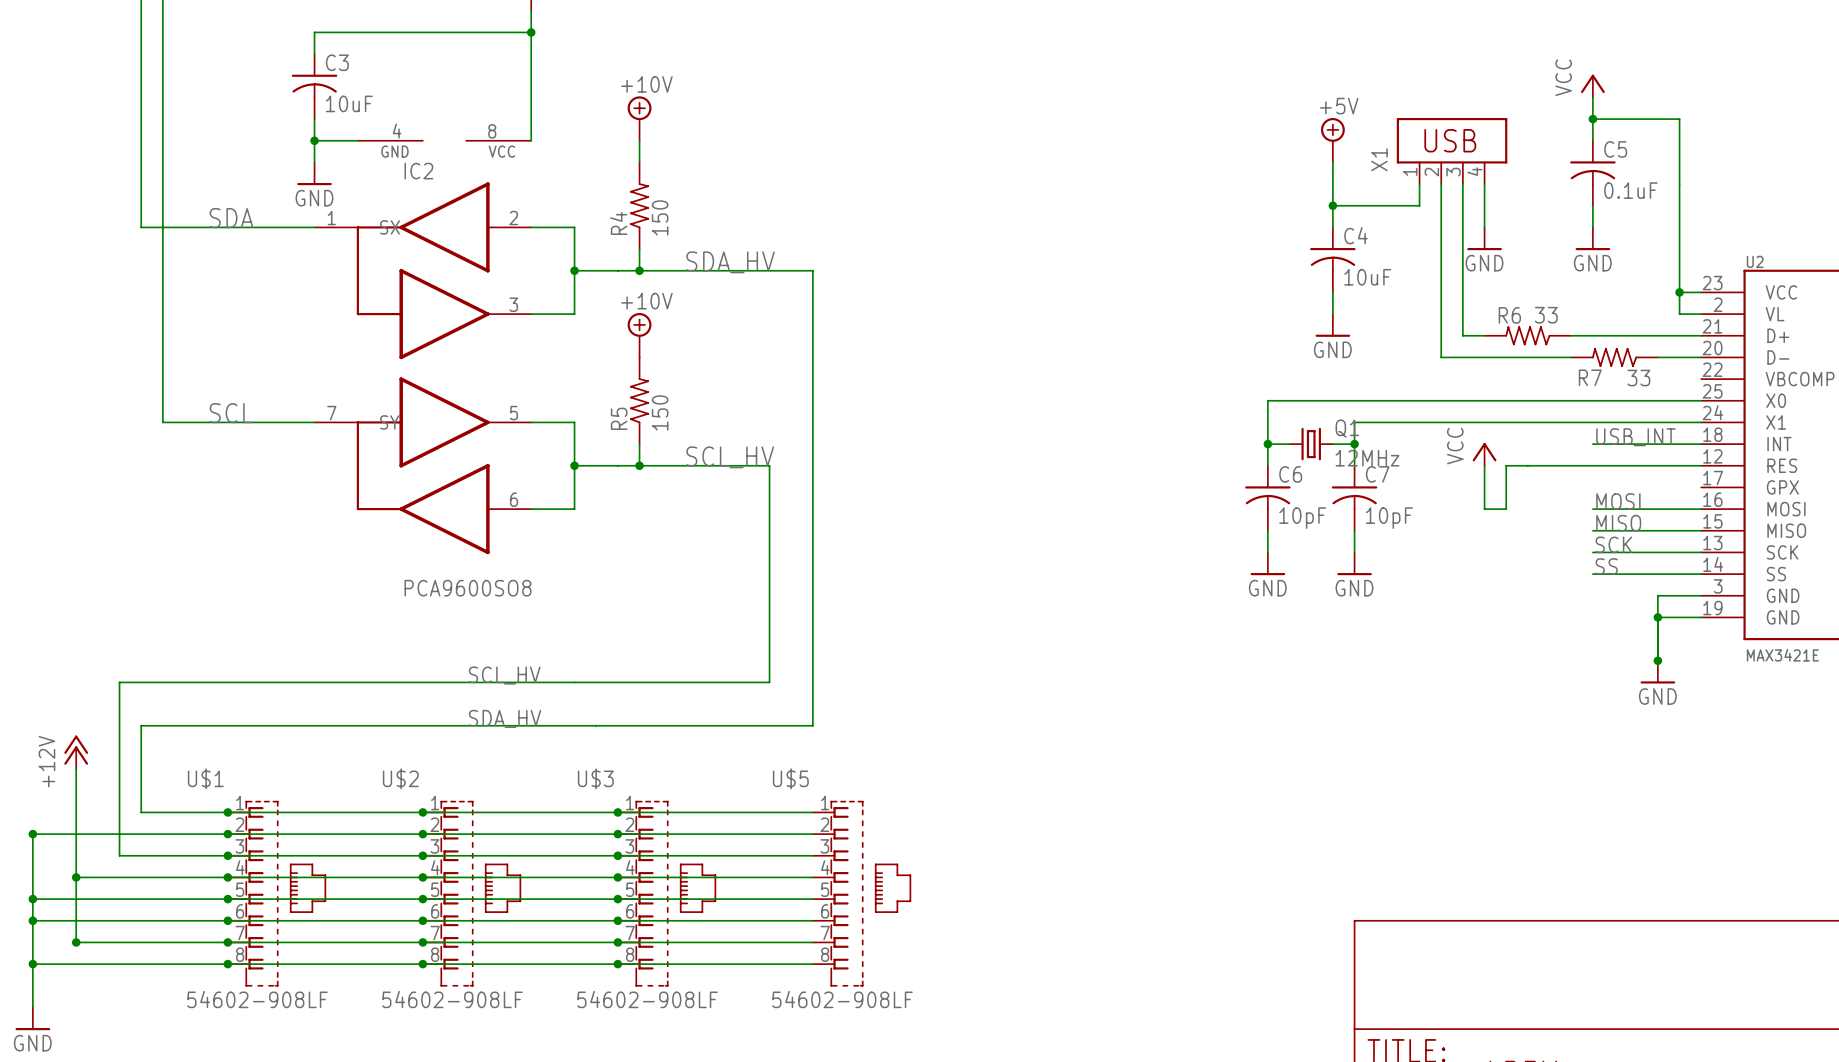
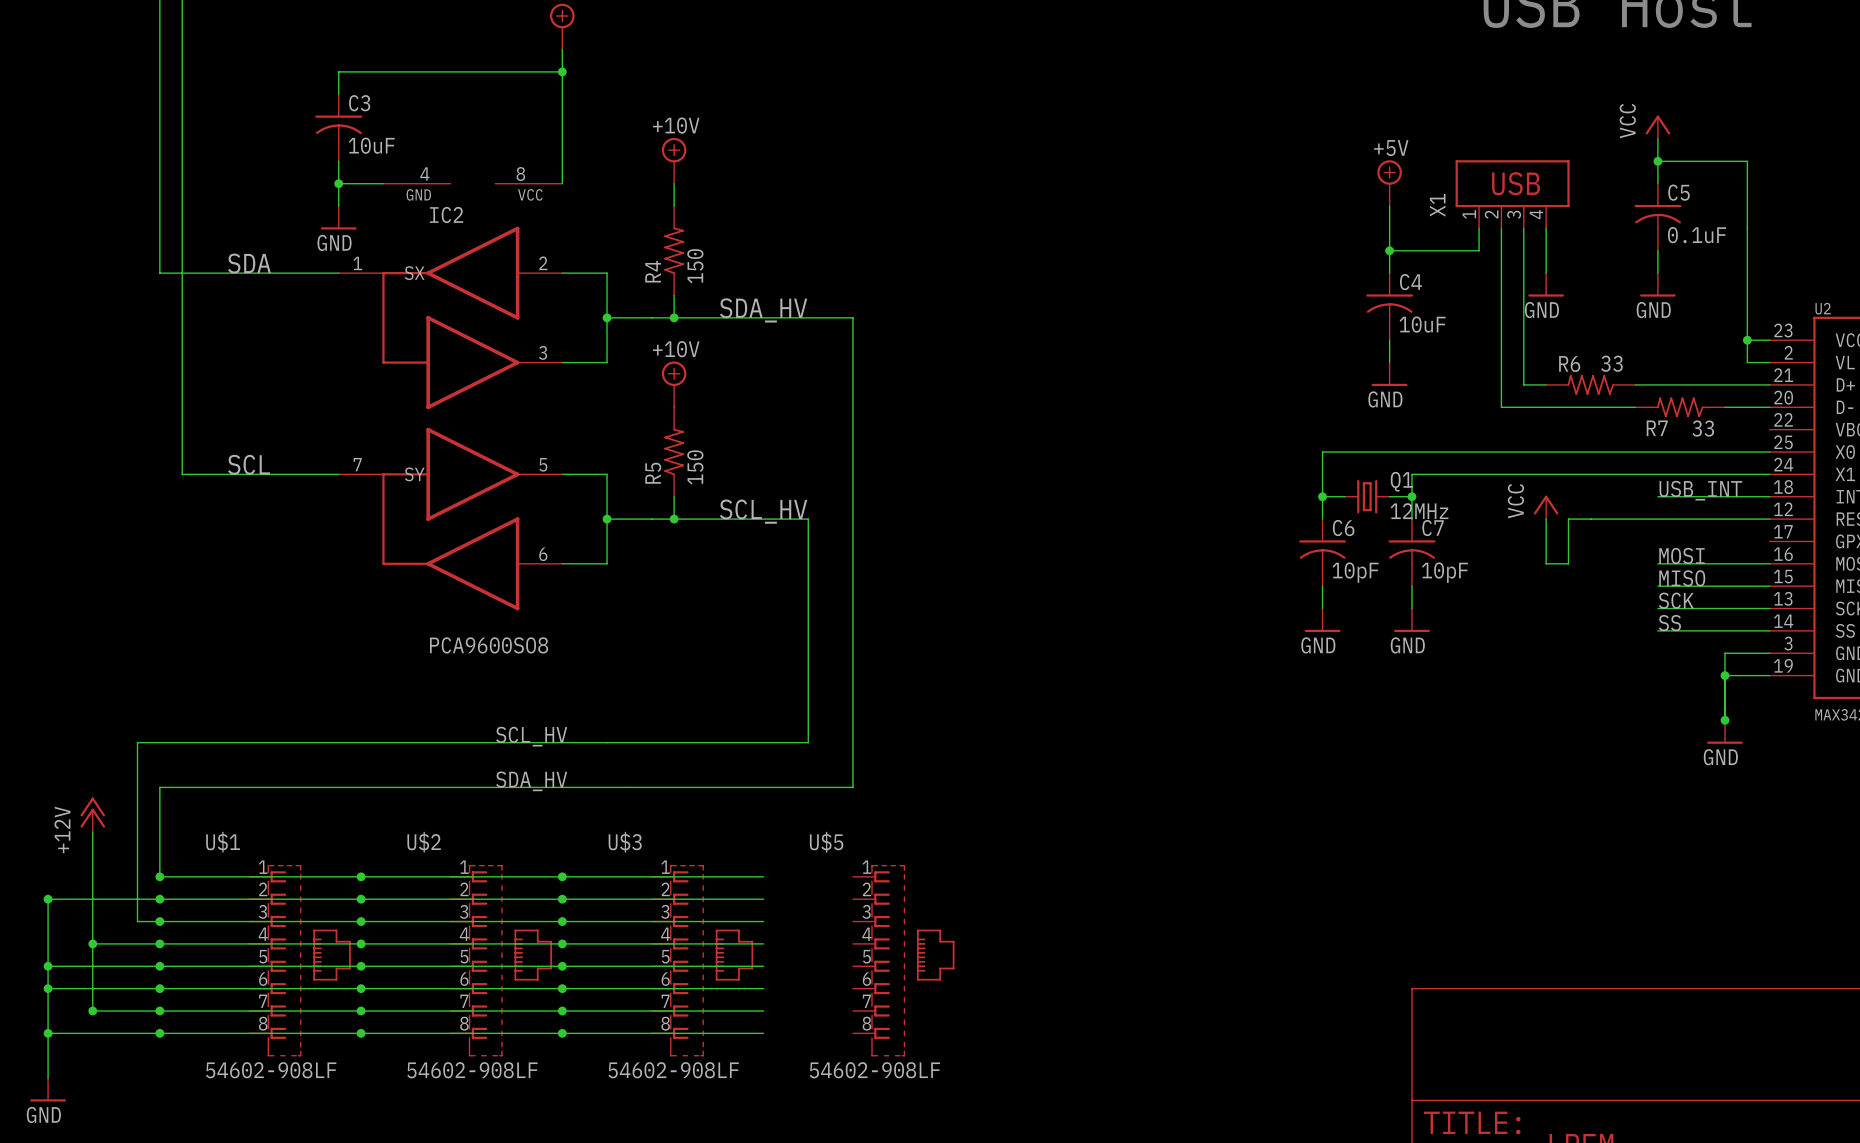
junction: none -> (159, 876)
junction: (227, 812) -> none
junction: none -> (361, 876)
junction: (422, 812) -> none
junction: none -> (562, 876)
junction: (617, 812) -> none
wire: (726, 812) (812, 812) -> none
junction: none -> (159, 899)
junction: (227, 834) -> none
junction: none -> (361, 899)
junction: (422, 834) -> none
junction: none -> (562, 899)
junction: (617, 834) -> none
wire: (726, 834) (812, 834) -> none
junction: none -> (159, 921)
junction: (227, 855) -> none
junction: none -> (361, 921)
junction: (422, 855) -> none
junction: none -> (562, 921)
junction: (617, 855) -> none
wire: (726, 855) (812, 855) -> none
junction: none -> (159, 943)
junction: (227, 877) -> none
junction: none -> (361, 943)
junction: (422, 877) -> none
junction: none -> (562, 943)
junction: (617, 877) -> none
wire: (726, 877) (812, 877) -> none
junction: none -> (159, 966)
junction: (227, 899) -> none
junction: none -> (361, 966)
junction: (422, 899) -> none
junction: none -> (562, 966)
junction: (617, 899) -> none
wire: (726, 899) (812, 899) -> none
junction: none -> (159, 988)
junction: (227, 920) -> none
junction: none -> (361, 988)
junction: (422, 920) -> none
junction: none -> (562, 988)
junction: (617, 920) -> none
wire: (726, 920) (812, 920) -> none
junction: none -> (159, 1010)
junction: (227, 942) -> none
junction: none -> (361, 1010)
junction: (422, 942) -> none
junction: none -> (562, 1010)
junction: (617, 942) -> none
wire: (726, 942) (812, 942) -> none
junction: none -> (159, 1033)
junction: (227, 964) -> none
junction: none -> (361, 1033)
junction: (422, 964) -> none
junction: none -> (562, 1033)
junction: (617, 964) -> none
wire: (726, 964) (812, 964) -> none

